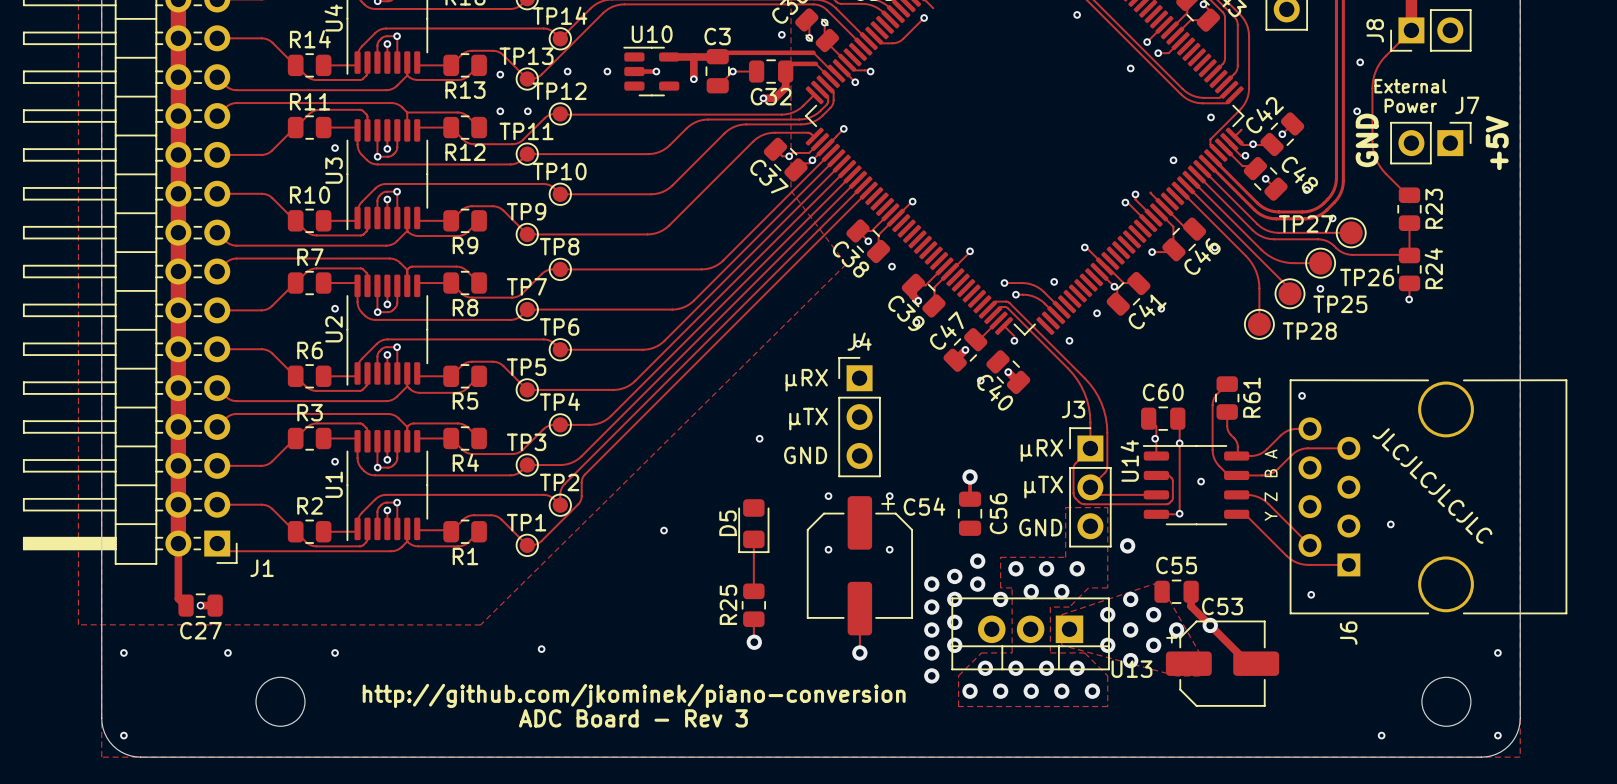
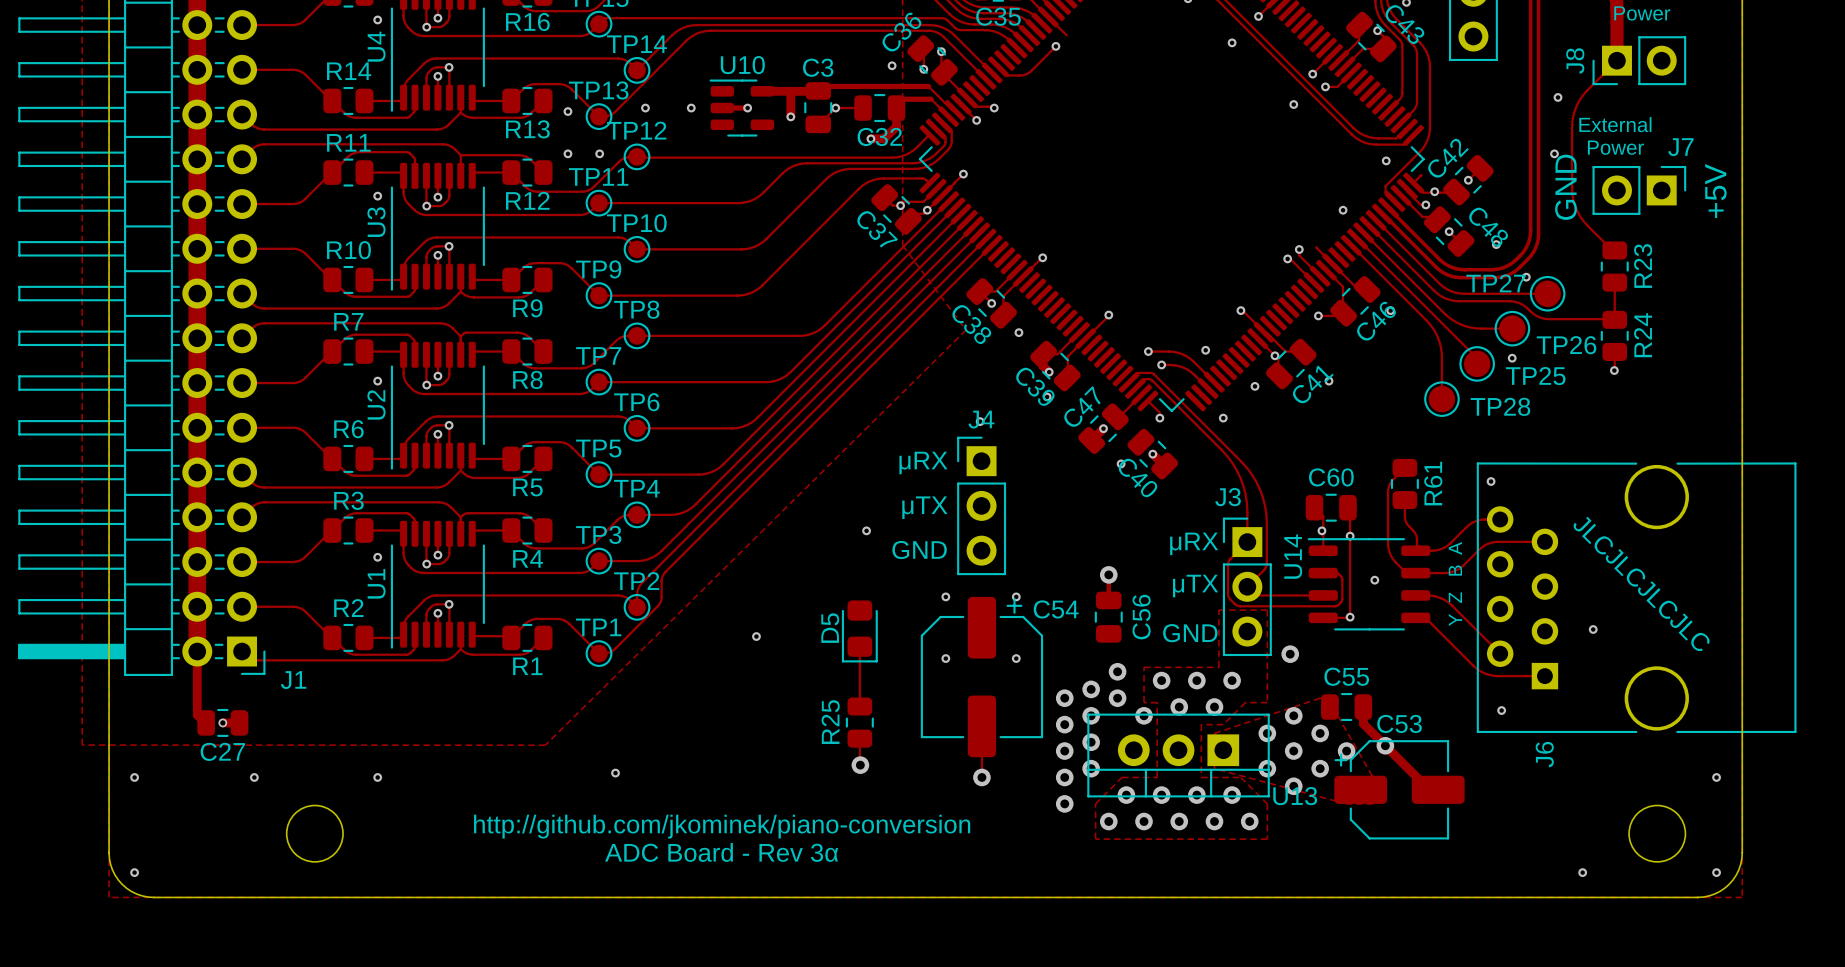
text: ADC Board - Rev 3 (633, 718) -> ADC Board - Rev 3α (721, 852)

